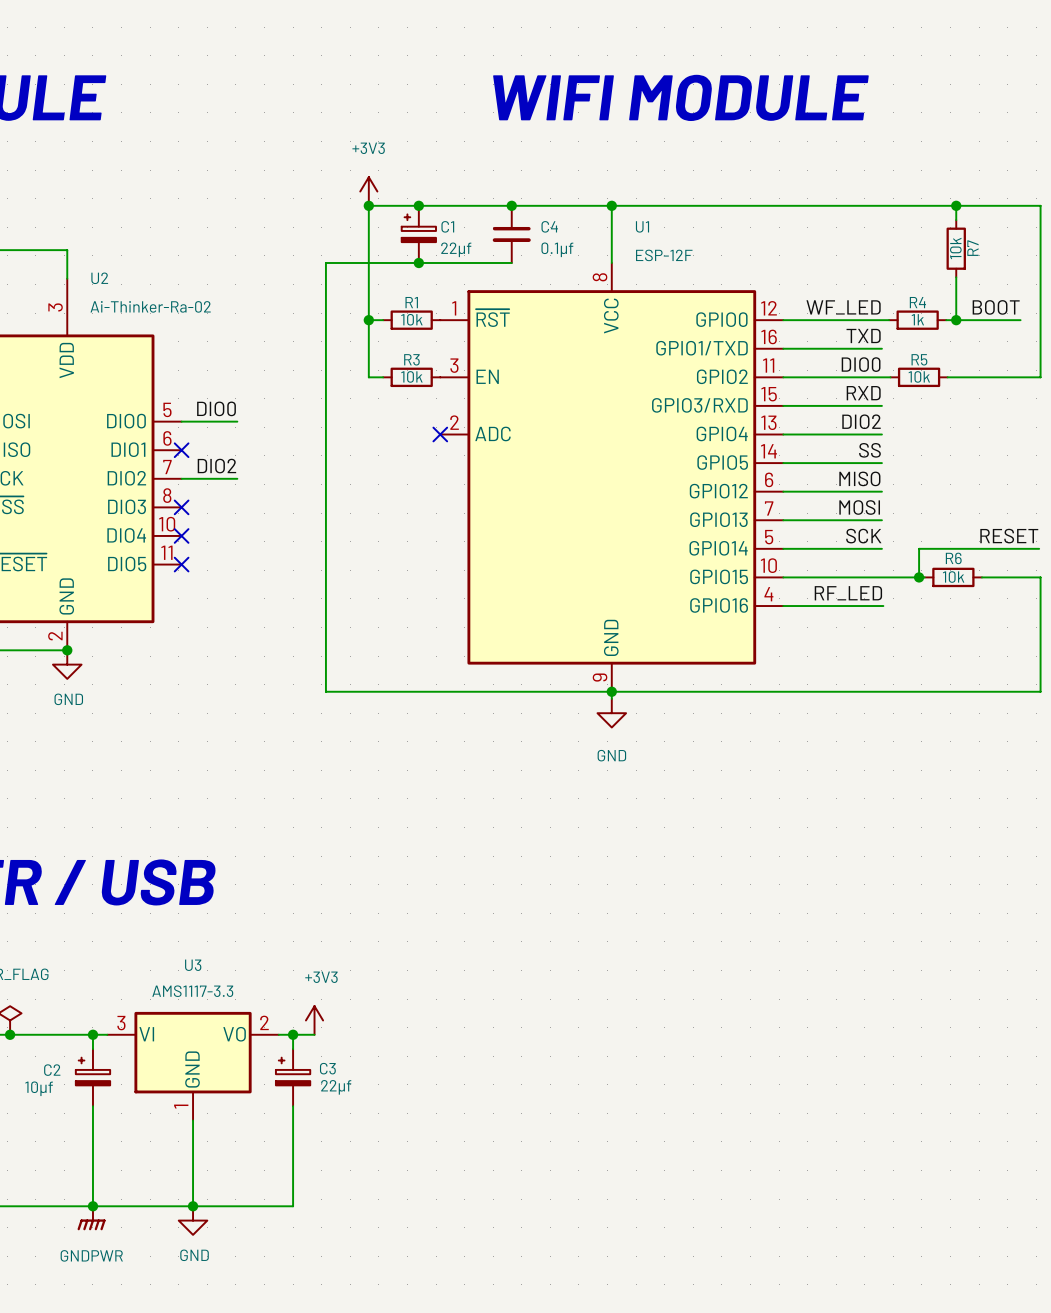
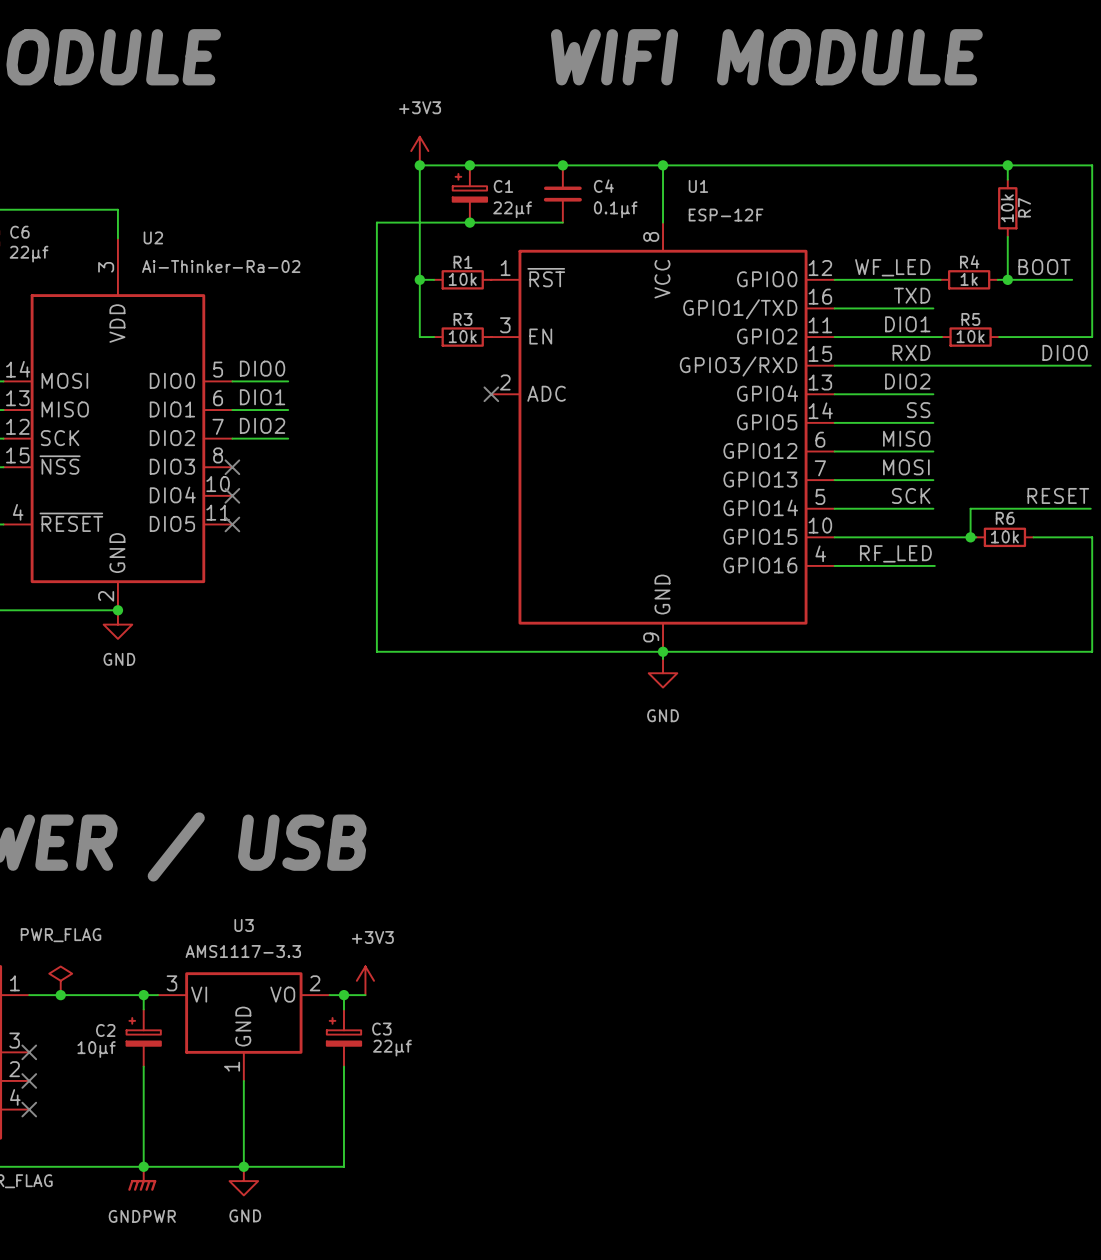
label: DIO0 (861, 364) -> DIO1 (907, 324)
label: none -> DIO0 (1065, 352)
wire: none -> (933, 365) (1090, 365)
label: none -> DIO1 (262, 397)
wire: none -> (232, 410) (288, 410)
no-connect mark: (181, 450) -> none

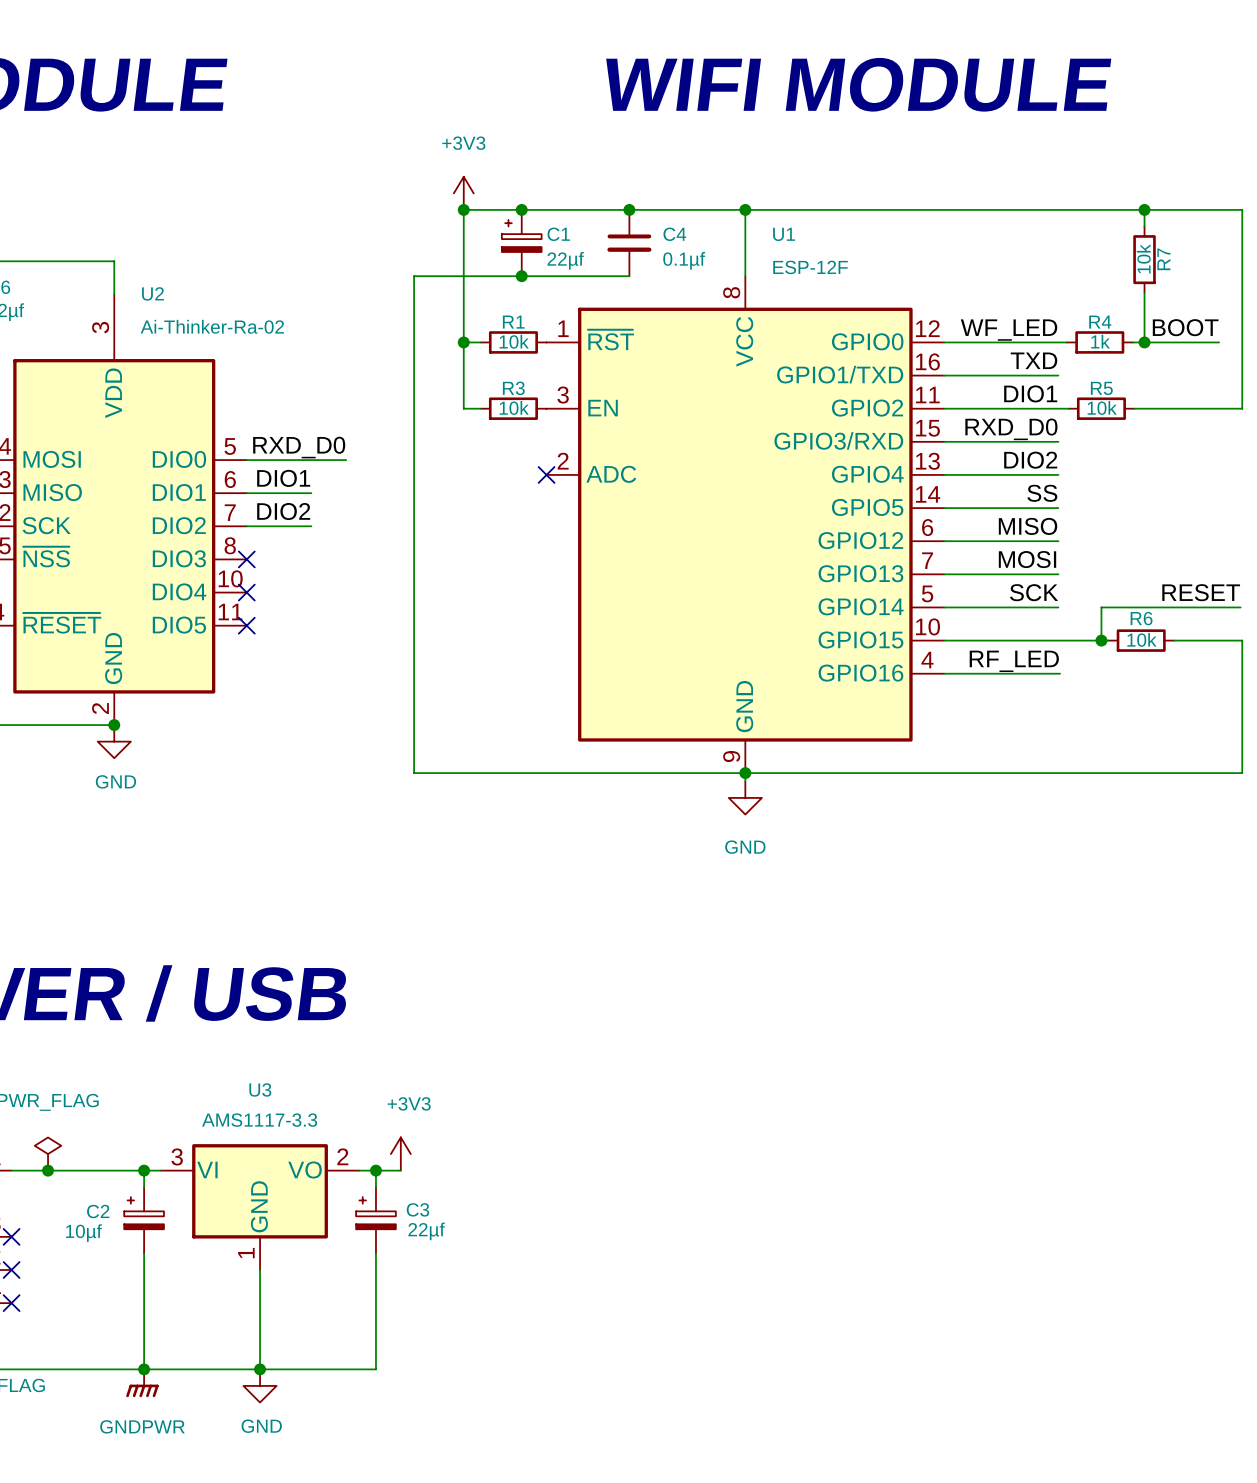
label: RXD (911, 352) -> RXD_D0 (1011, 429)
label: DIO0 (1065, 352) -> none
wire: (933, 365) (1090, 365) -> none
label: DIO0 (262, 368) -> none
label: none -> RXD_D0 (299, 447)
wire: none -> (311, 460) (346, 460)

